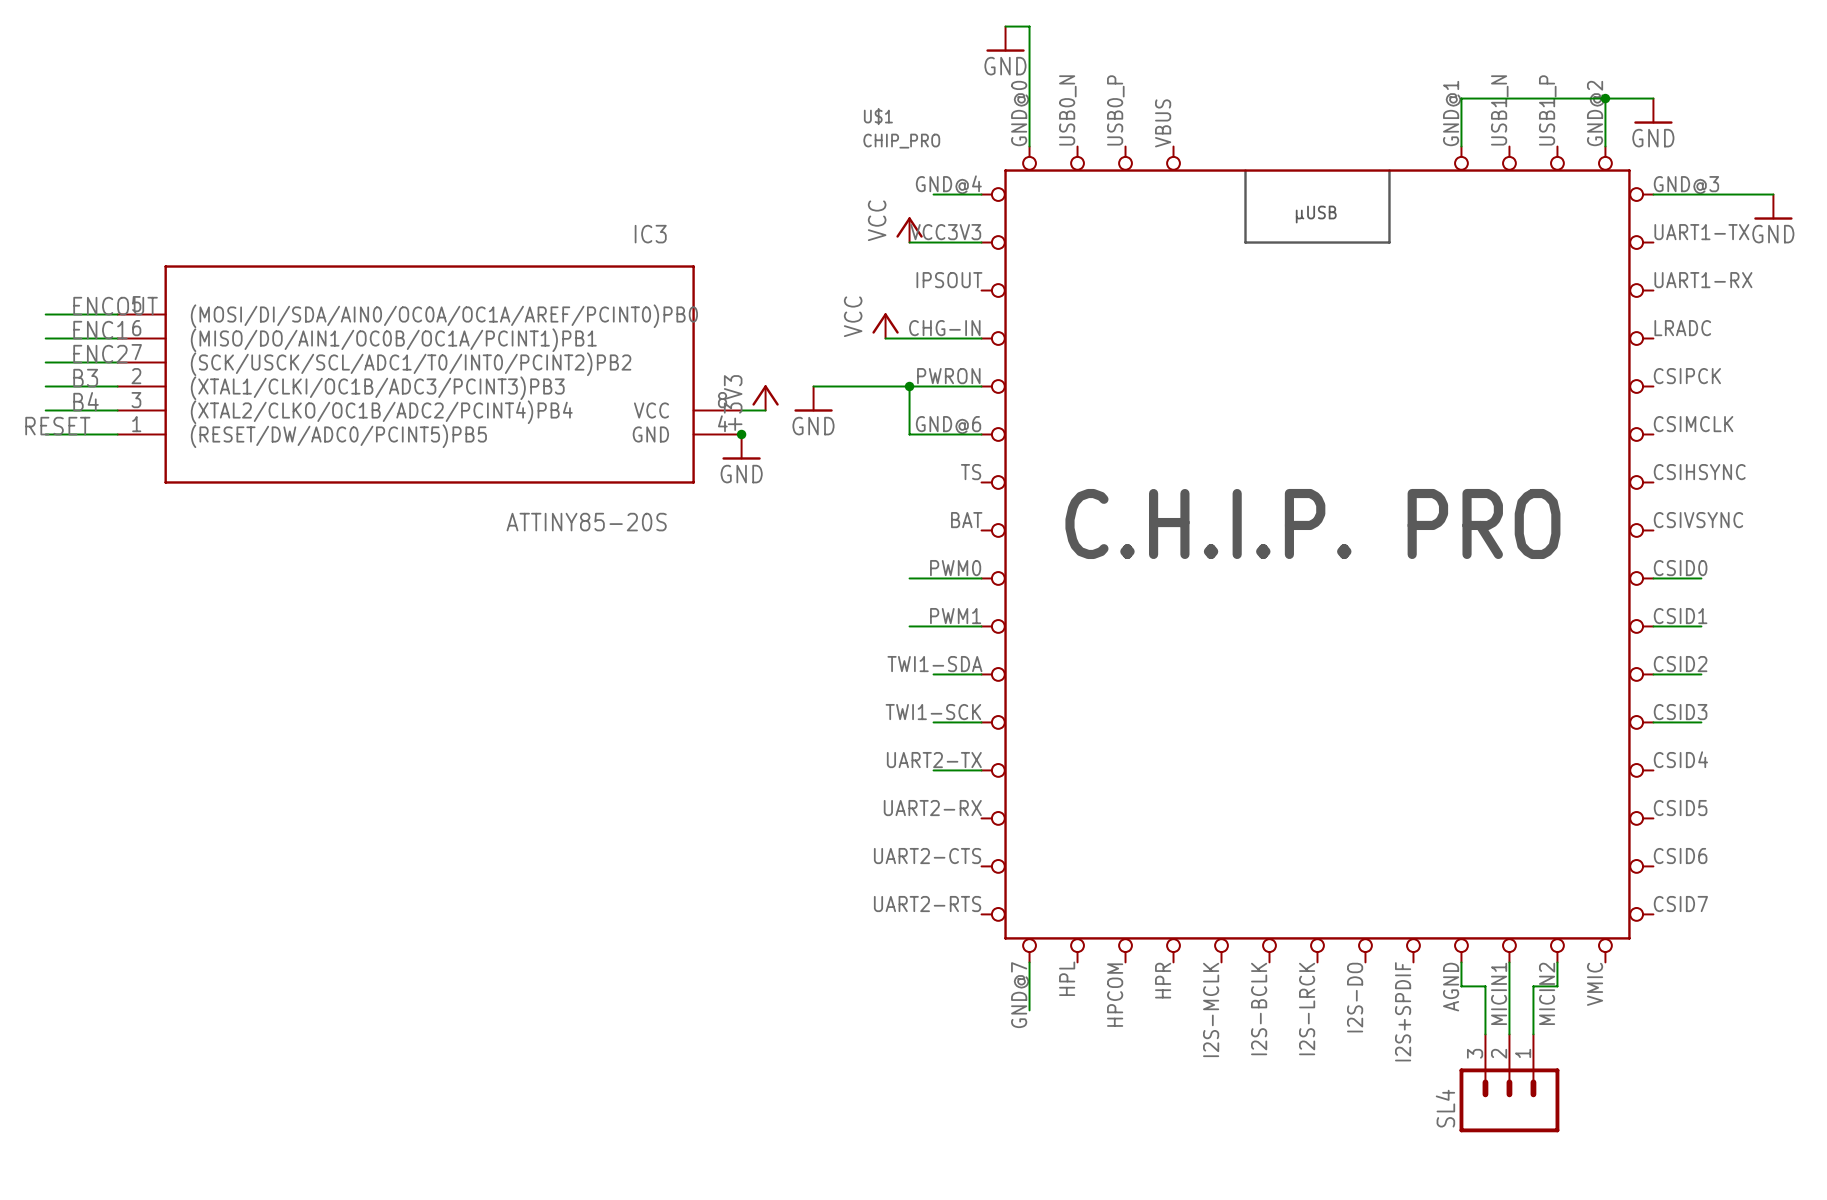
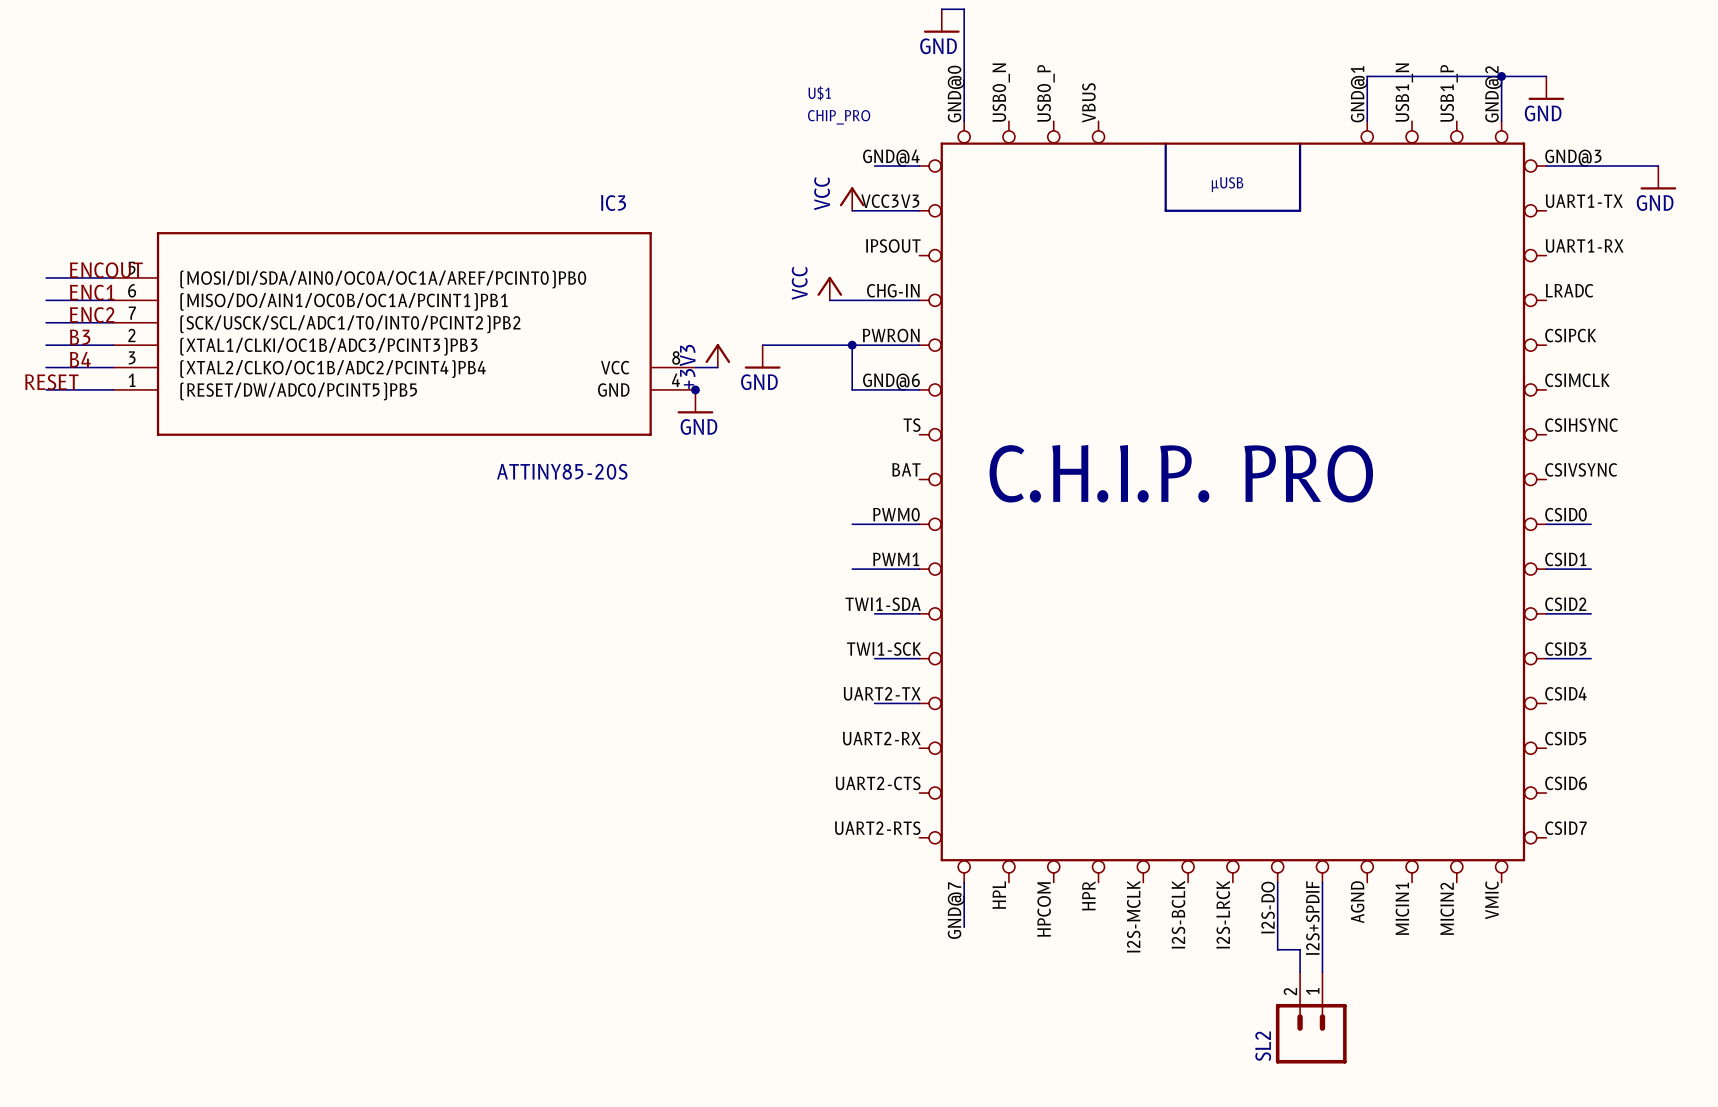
wire: none -> (1277, 882) (1277, 949) (1300, 949) (1300, 972)
wire: none -> (1322, 882) (1322, 972)
wire: (1461, 962) (1461, 986) (1485, 986) (1485, 1034) -> none
wire: (1509, 962) (1509, 1034) -> none
wire: (1557, 962) (1557, 986) (1533, 986) (1533, 1034) -> none
SL4: (1509, 1083) -> none
SL2: none -> (1311, 1017)

